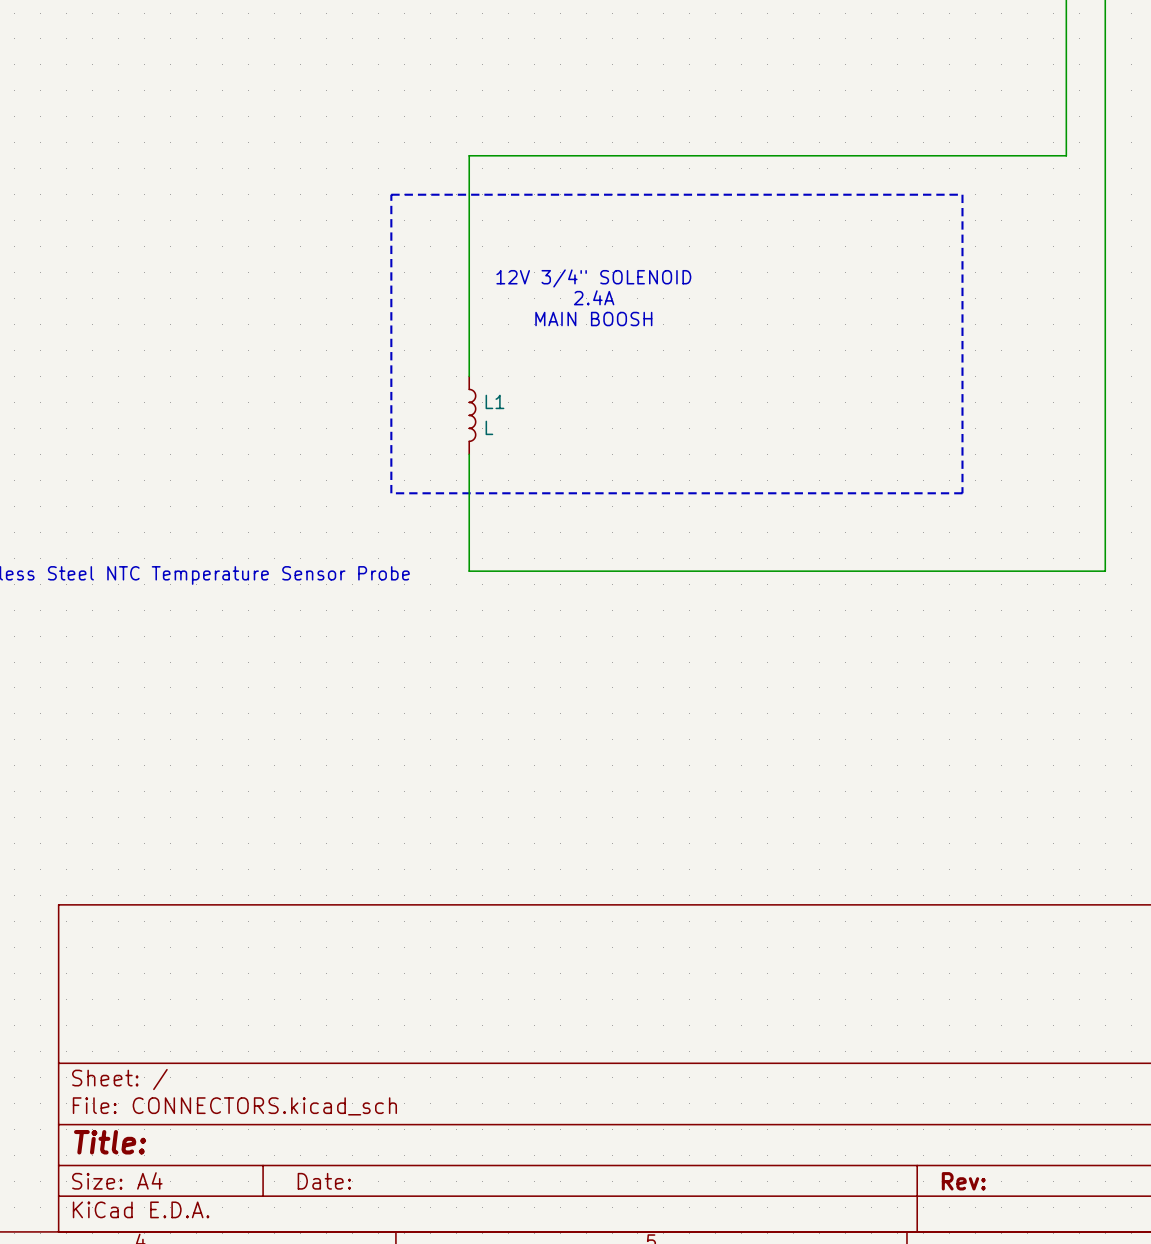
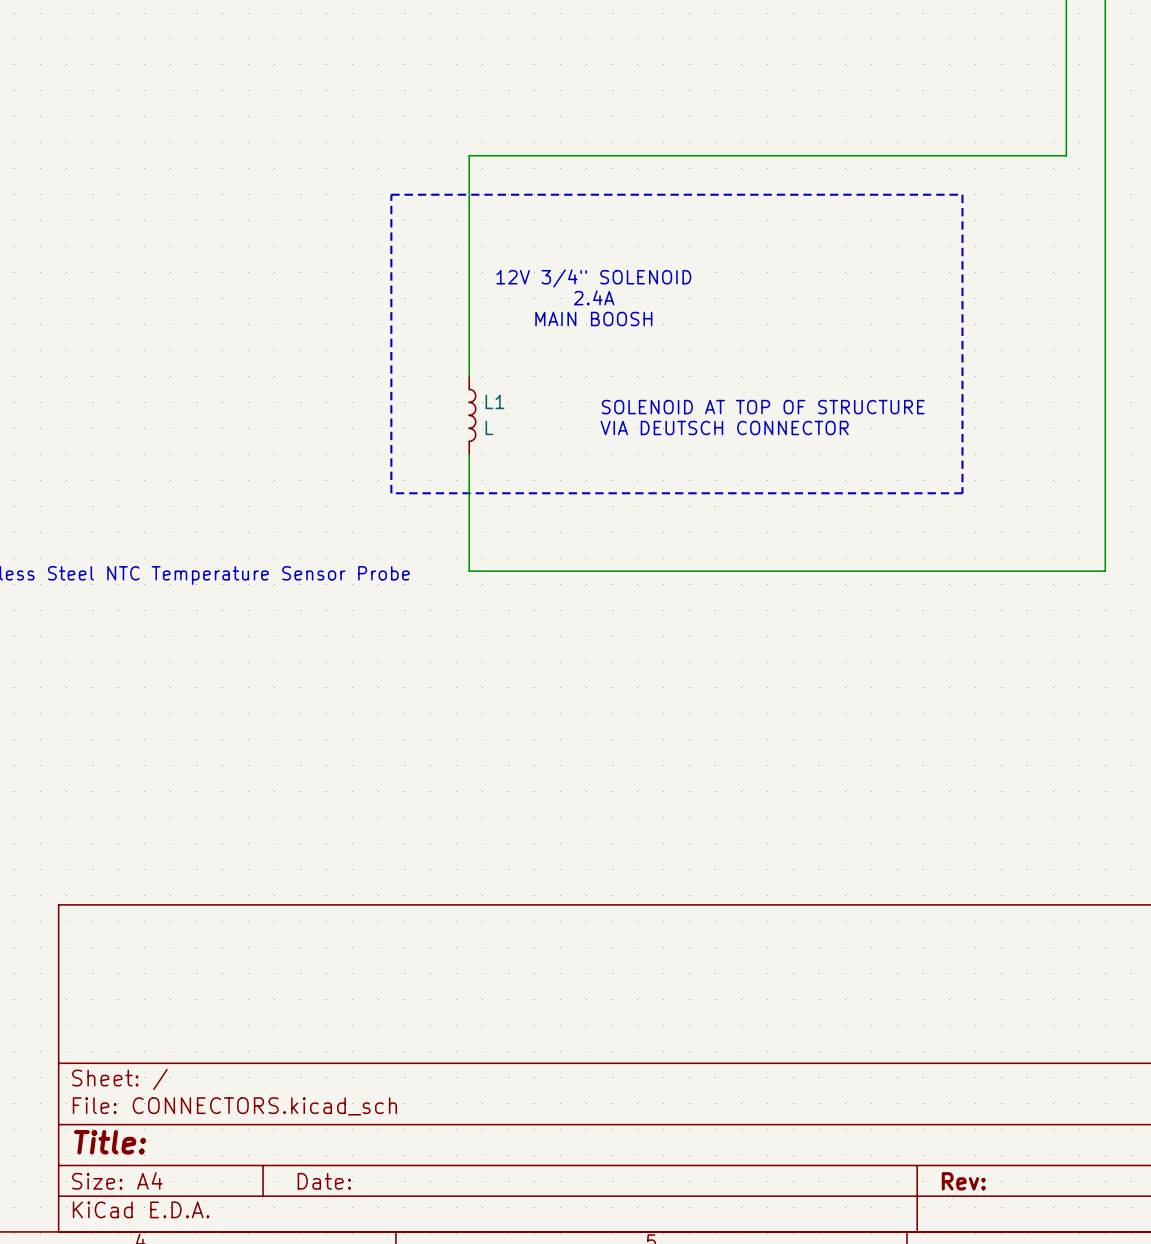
text: none -> SOLENOID AT TOP OF STRUCTURE (763, 407)
text: none -> VIA DEUTSCH CONNECTOR (724, 427)

